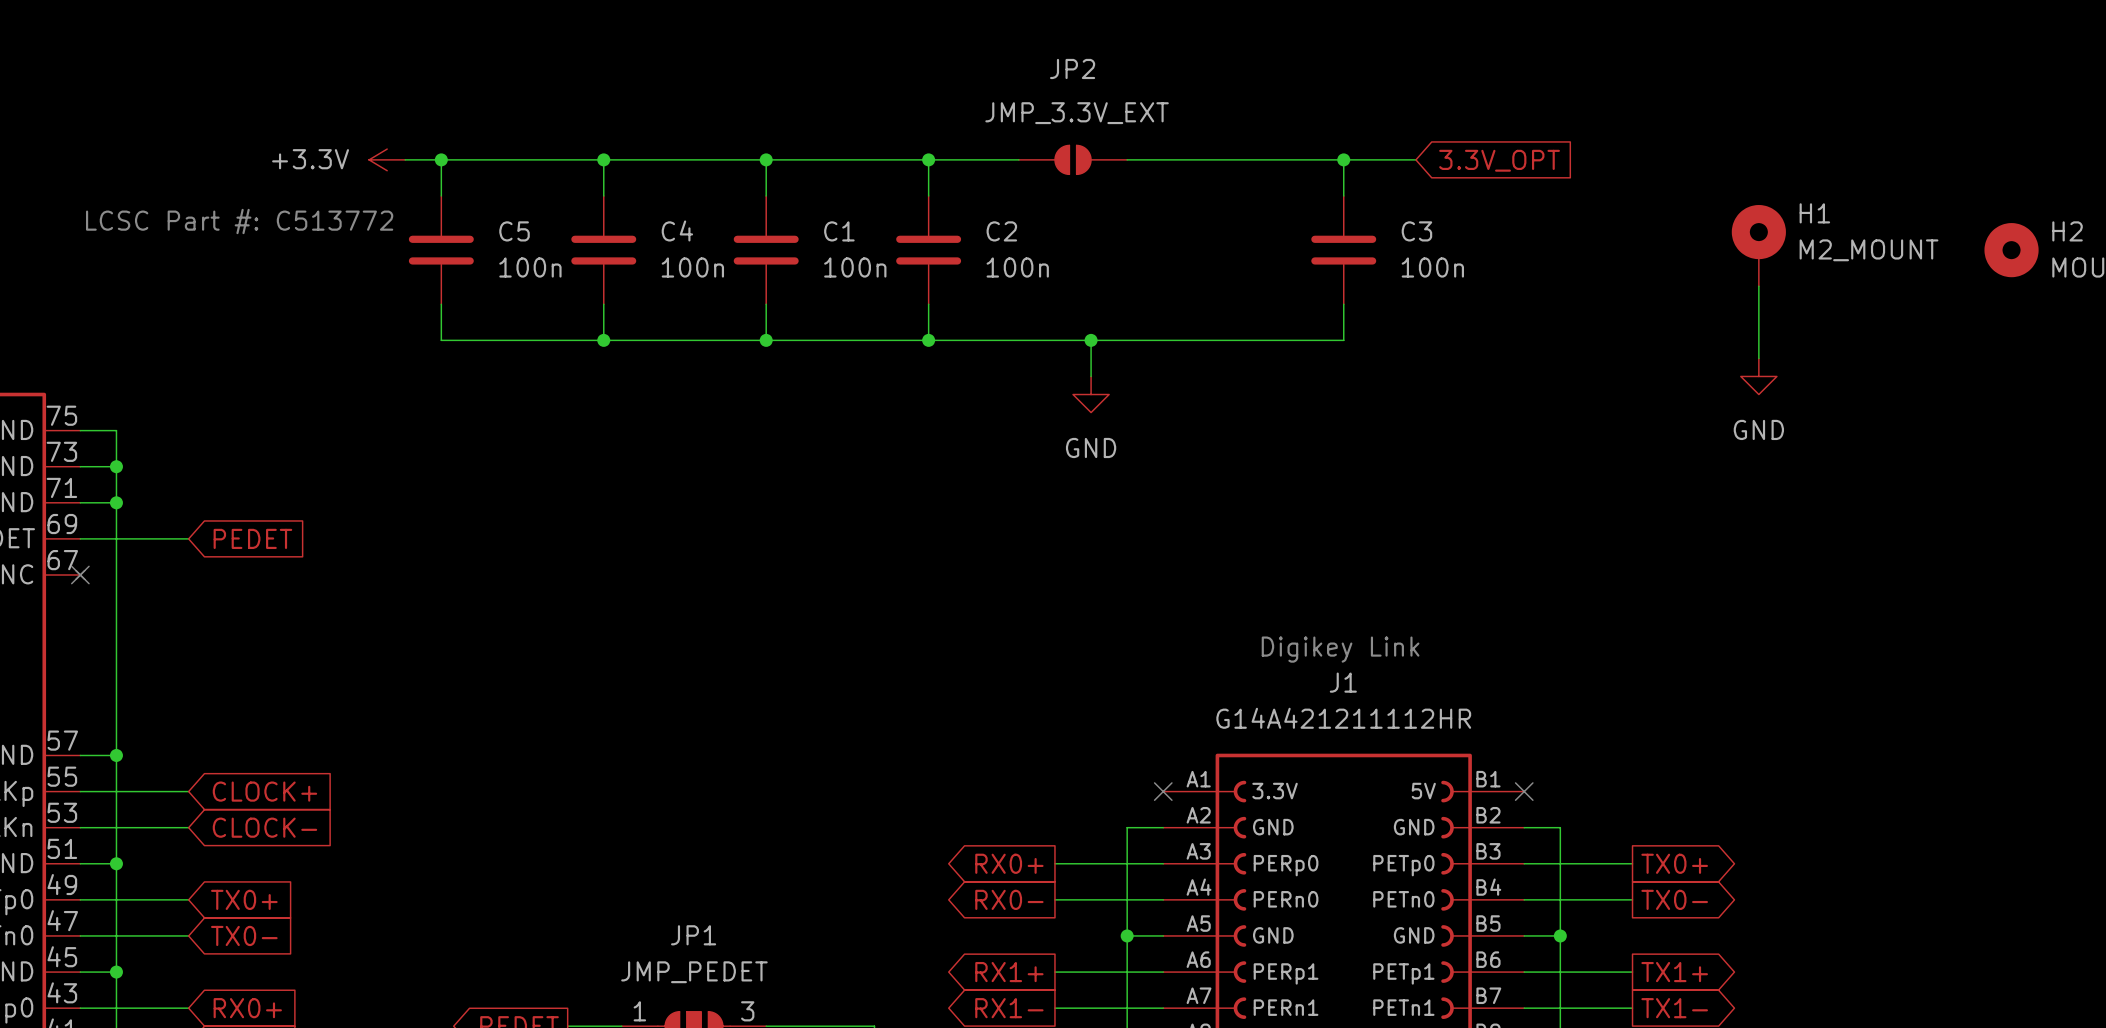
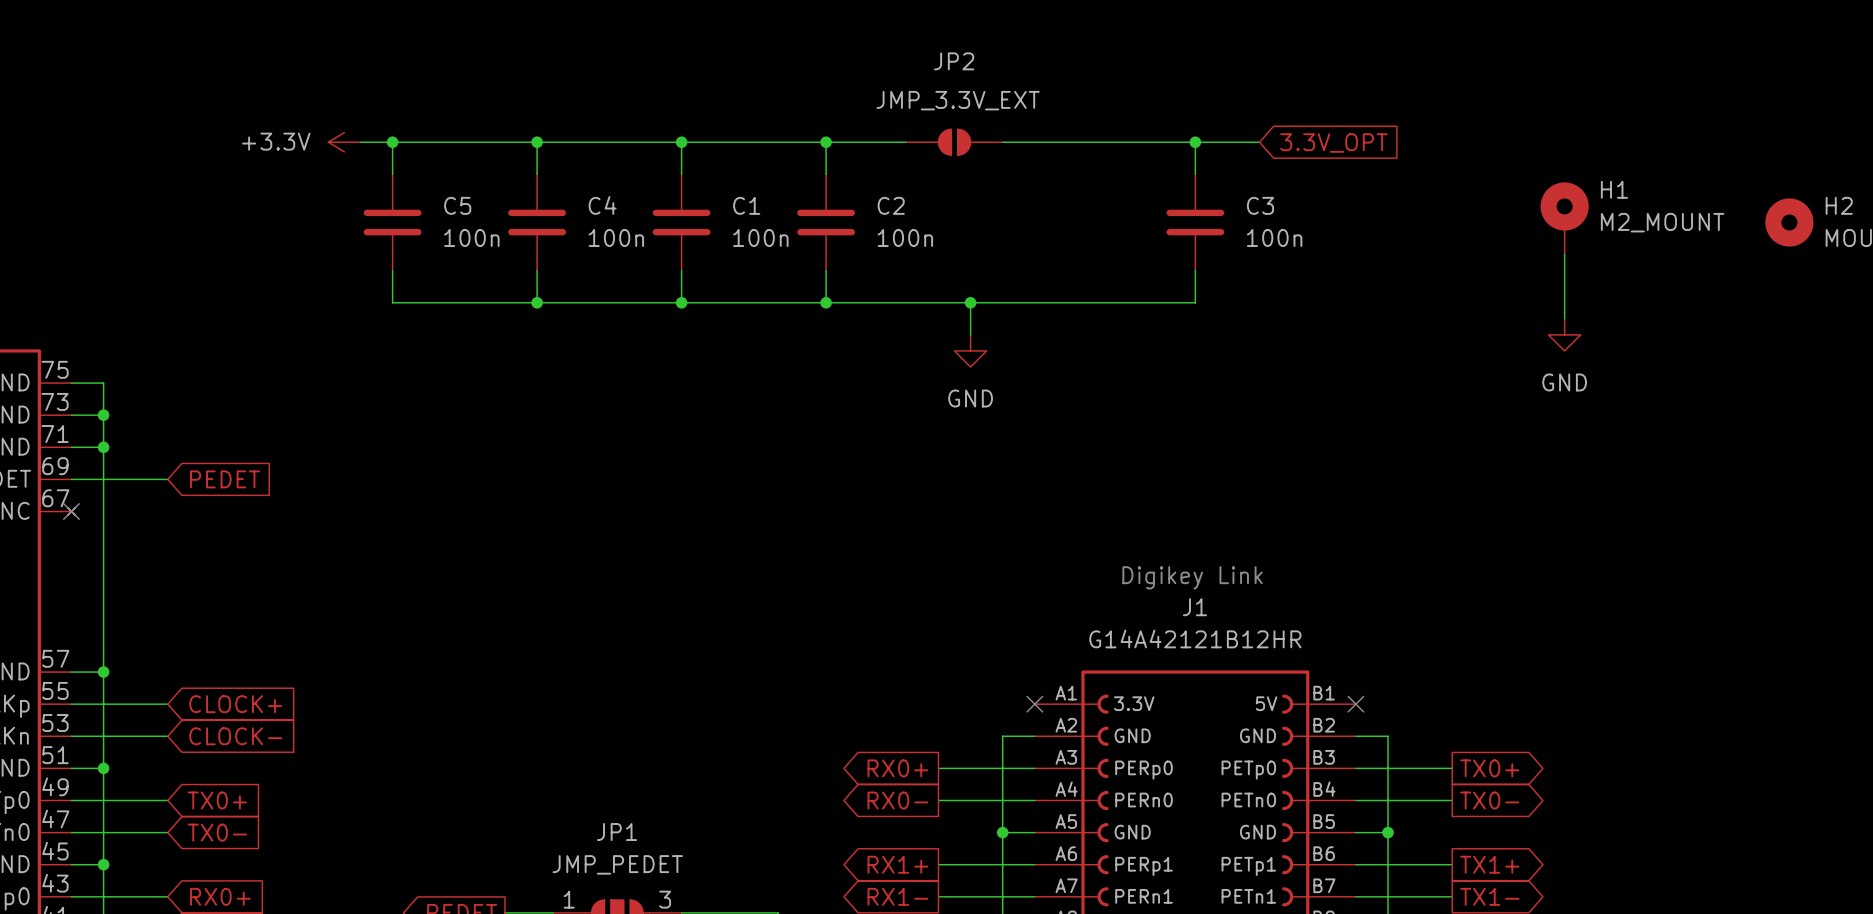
text: LCSC Part #: C513772 (239, 221) -> none
J1 value: G14A421211112HR (1343, 718) -> G14A42121B12HR (1195, 638)

